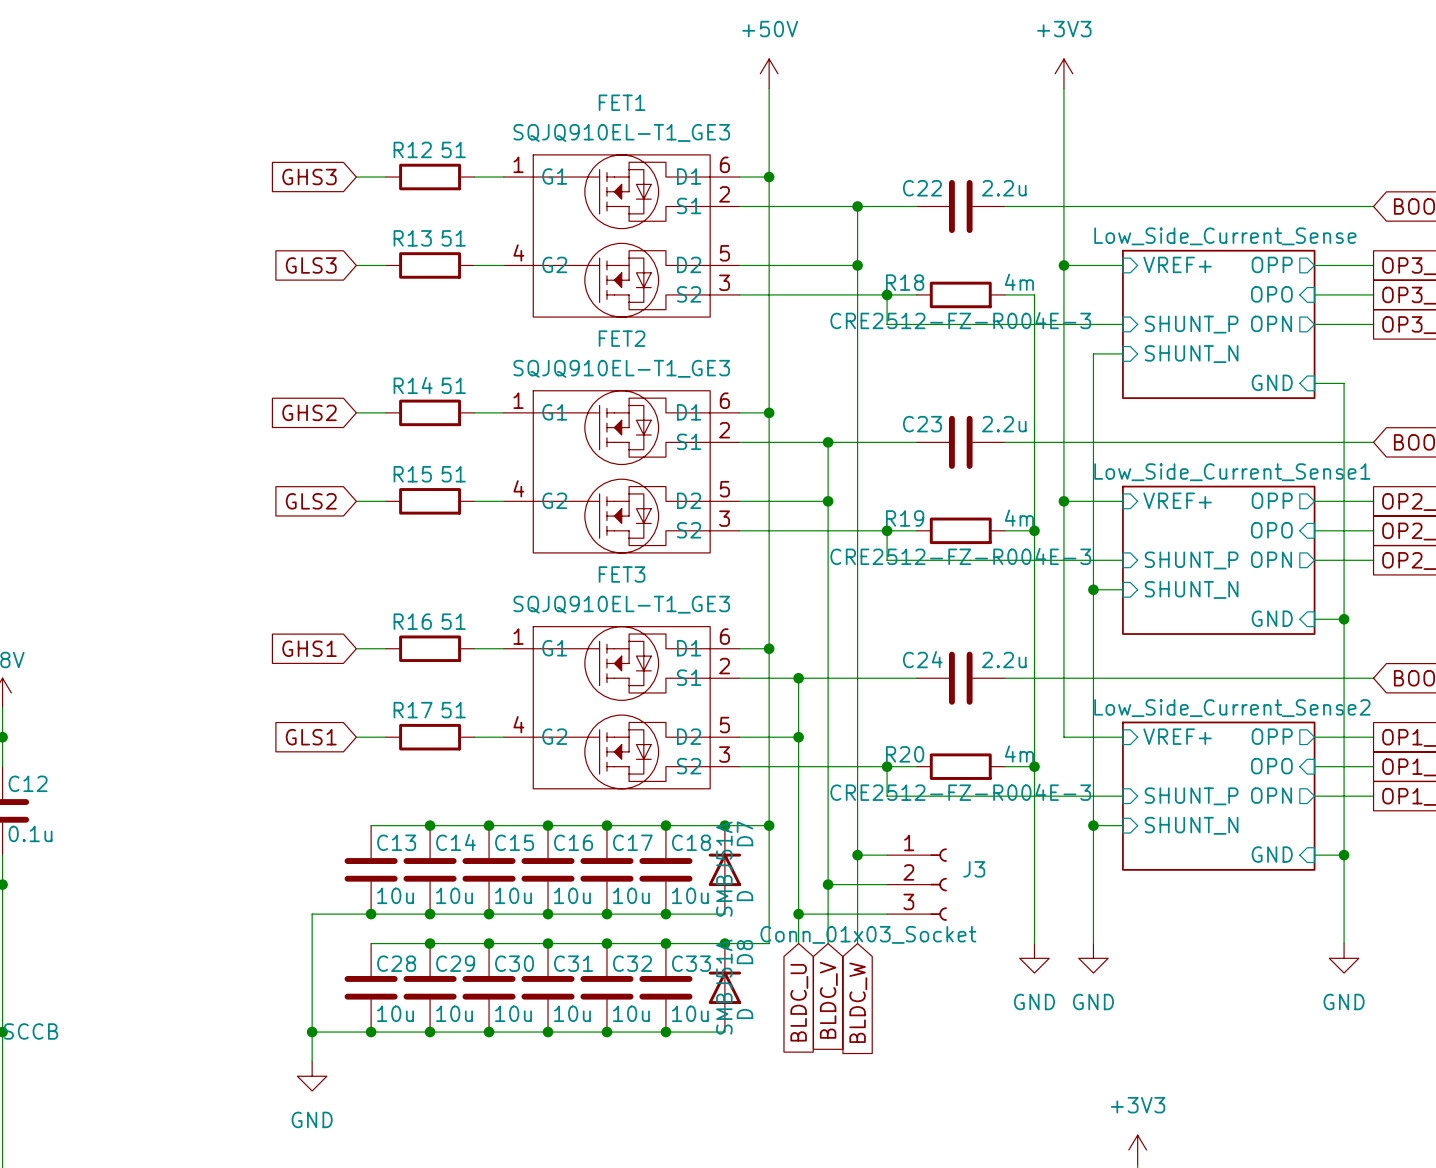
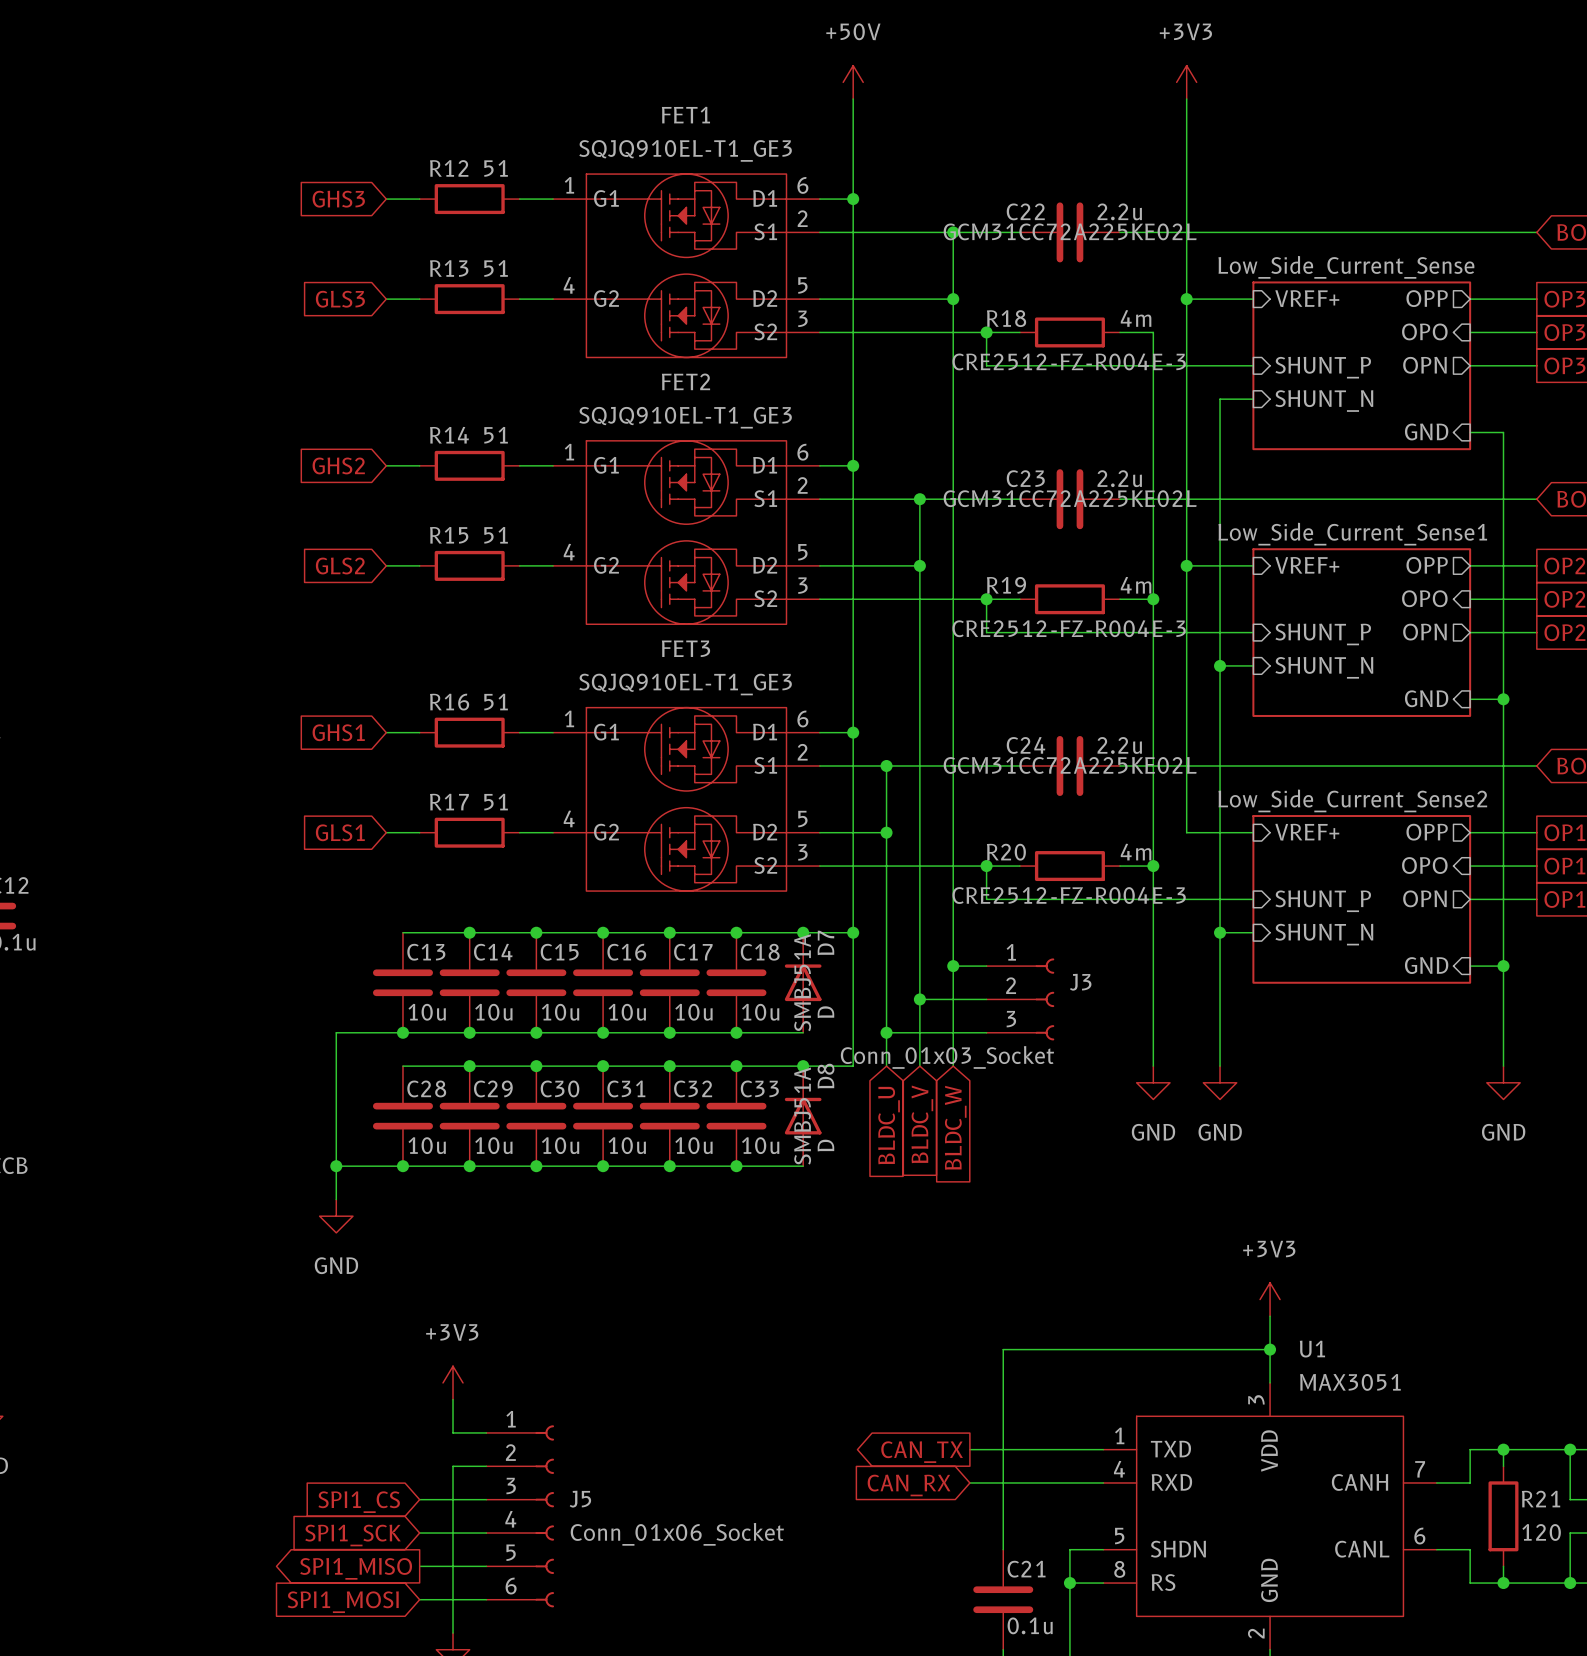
C22 text: none -> GCM31CC72A225KE02L (1070, 231)
C23 text: none -> GCM31CC72A225KE02L (1070, 498)
C24 text: none -> GCM31CC72A225KE02L (1070, 765)

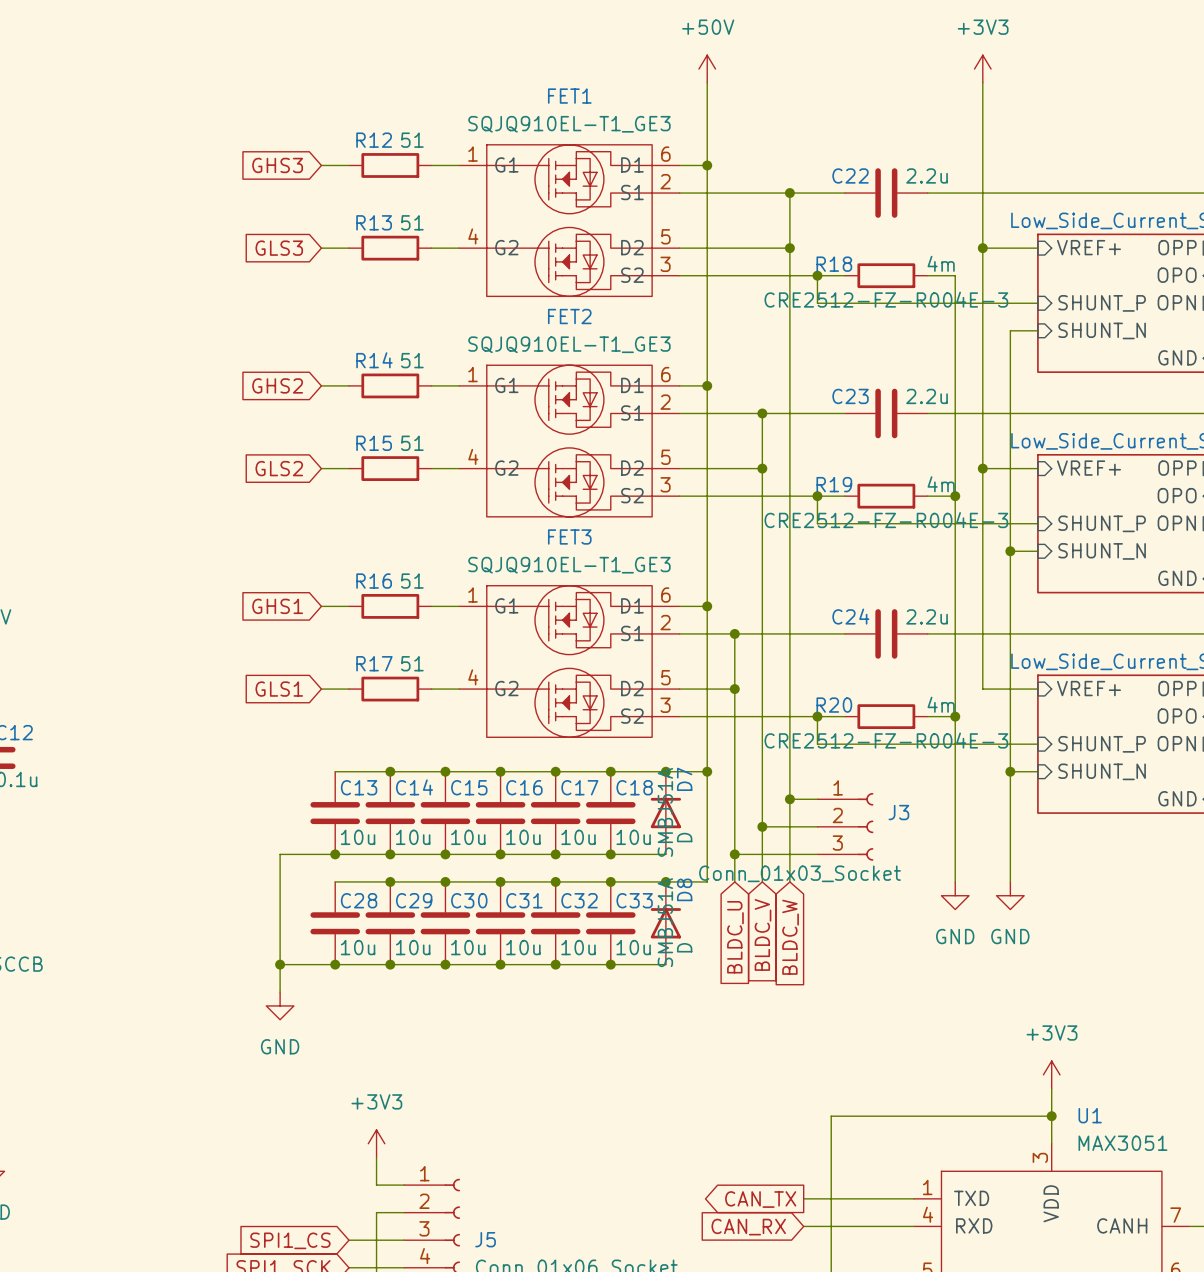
C22 text: GCM31CC72A225KE02L (1070, 231) -> none
C23 text: GCM31CC72A225KE02L (1070, 498) -> none
C24 text: GCM31CC72A225KE02L (1070, 765) -> none

